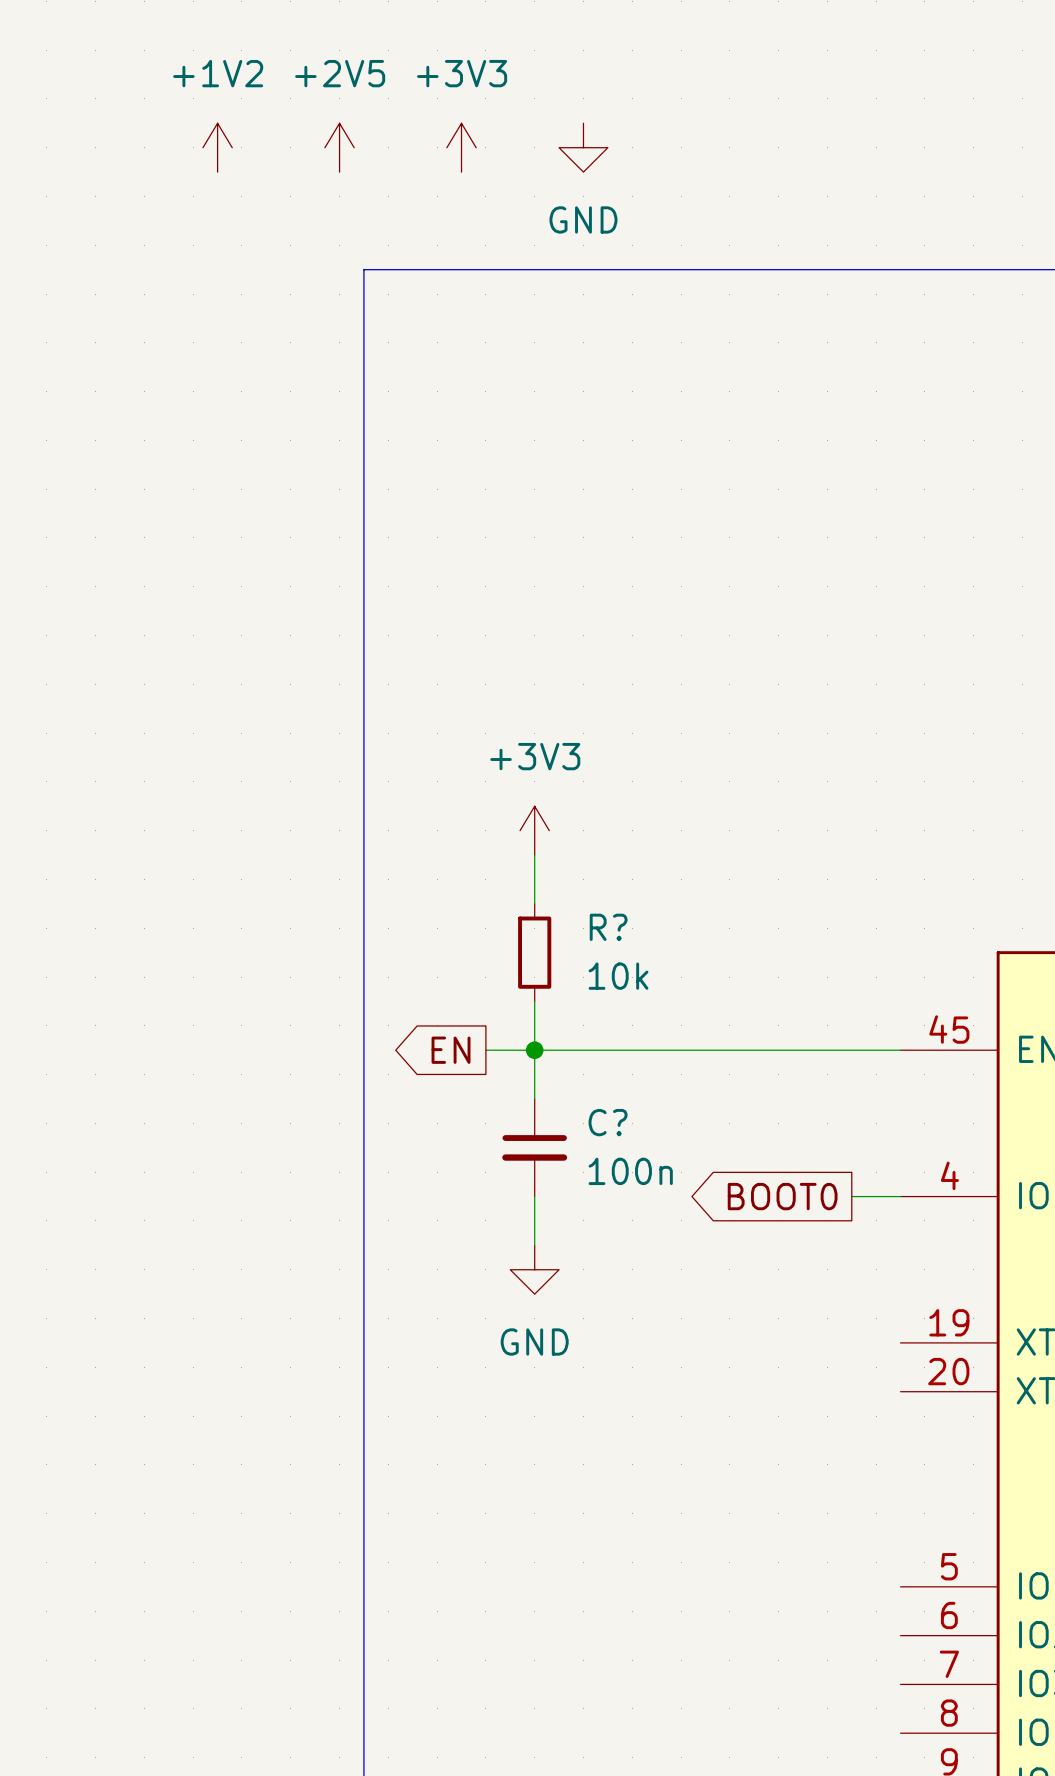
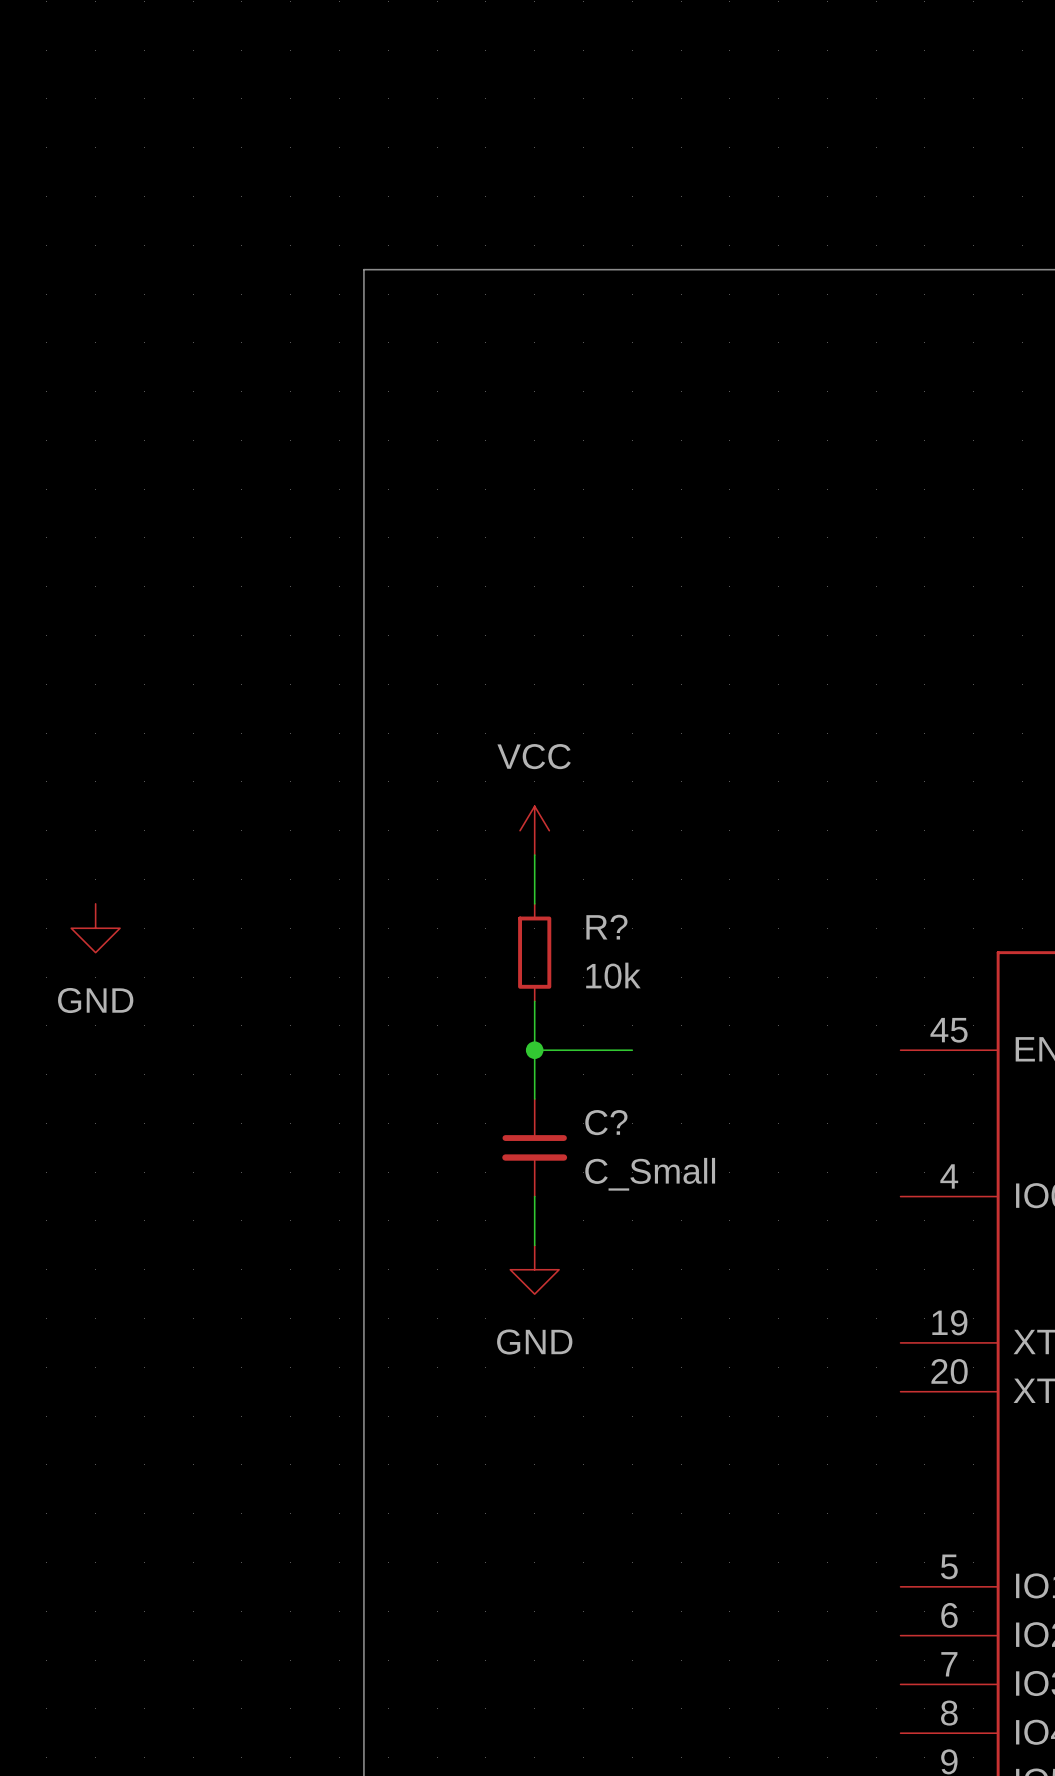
power symbol: +1V2 (217, 147) -> none
power symbol: +2V5 (339, 147) -> none
power symbol: +3V3 (461, 147) -> none
power symbol: GND (583, 147) -> none
power symbol: +3V3 (534, 830) -> VCC (534, 830)
power symbol: none -> GND (95, 928)
global label: EN (451, 1050) -> none
wire: (485, 1050) (534, 1050) -> none
wire: (632, 1050) (900, 1050) -> none
C? value: 100n (630, 1171) -> C_Small (650, 1174)
global label: BOOT0 (782, 1196) -> none
wire: (851, 1196) (900, 1196) -> none

